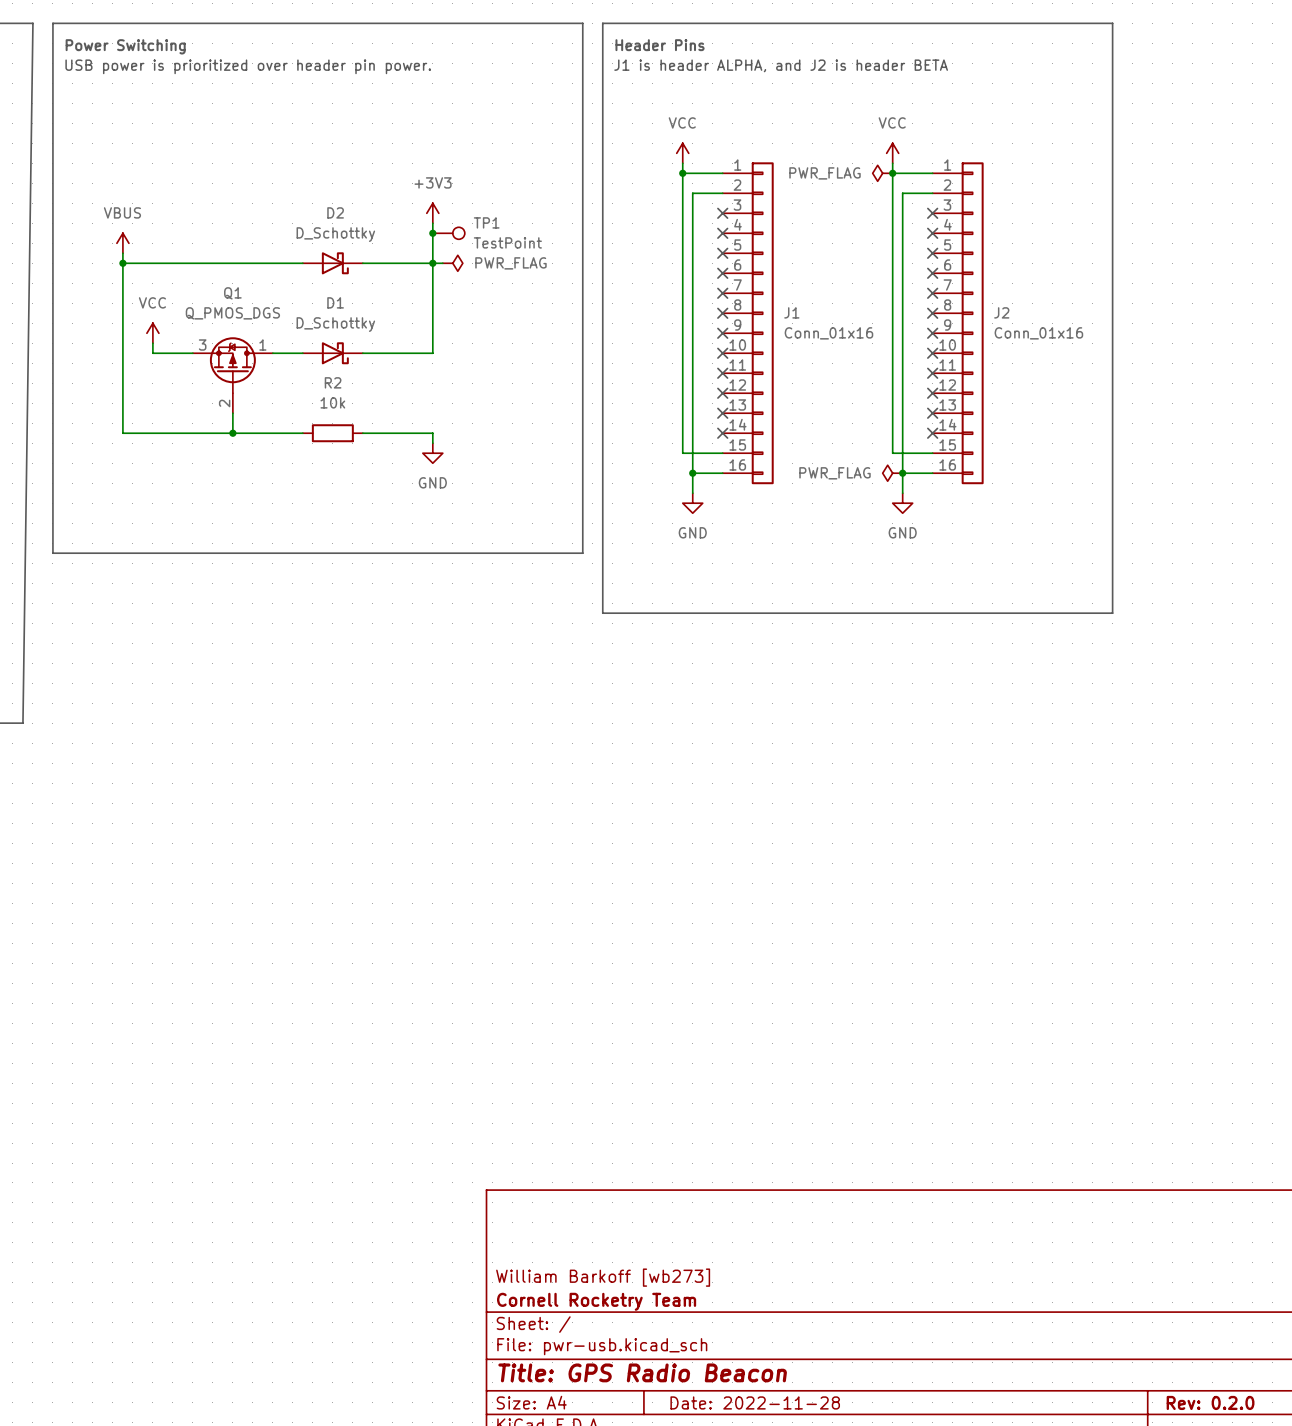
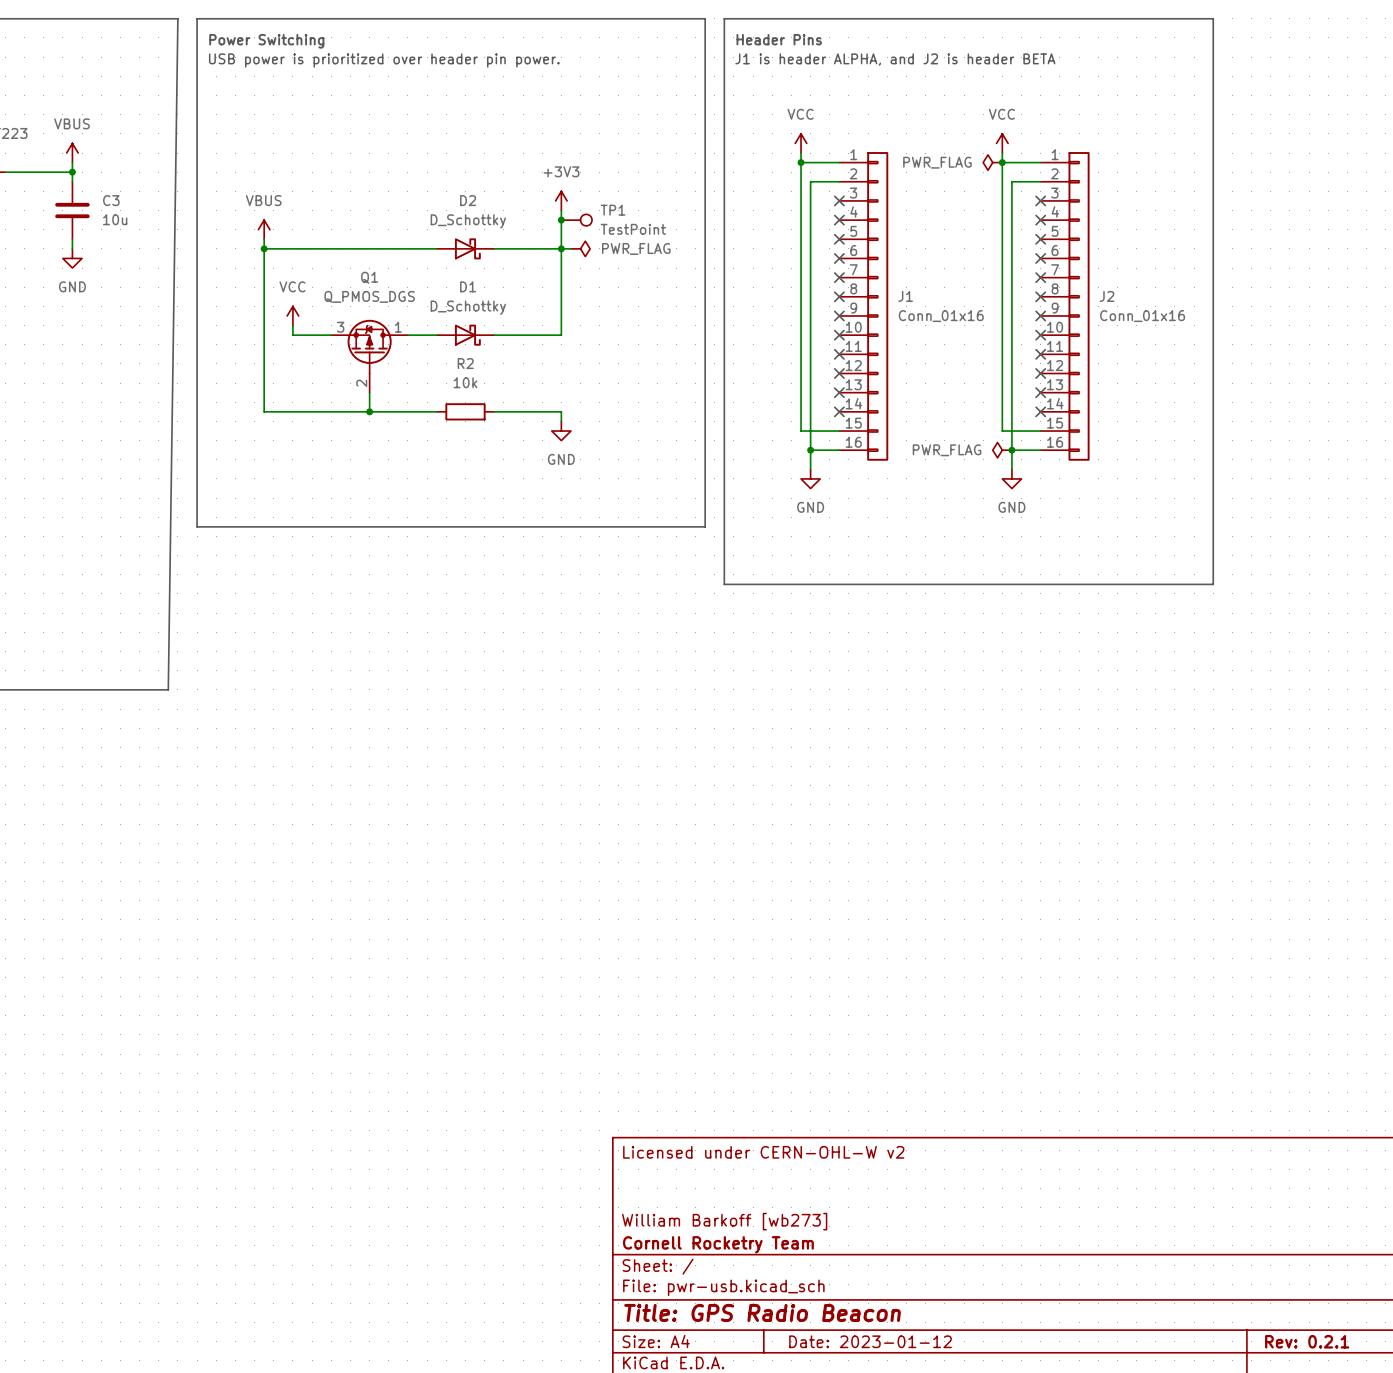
title block: none -> Licensed under CERN-OHL-W v2 (763, 1152)
title block: Date: 2022-11-28 (755, 1402) -> Date: 2023-01-12 (870, 1341)
title block: Rev: 0.2.0 (1210, 1402) -> Rev: 0.2.1 (1307, 1341)

